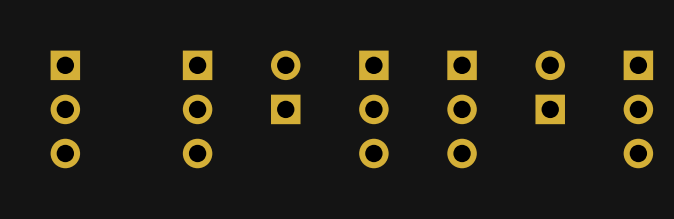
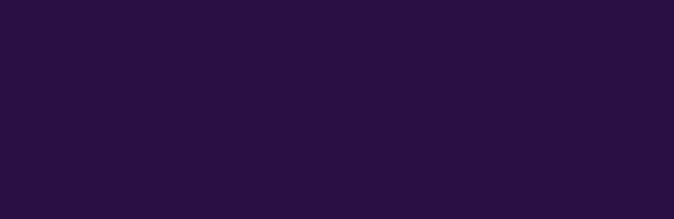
part: (285, 87) -> none
part: (550, 87) -> none
part: (65, 109) -> none
part: (197, 109) -> none
part: (373, 109) -> none
part: (462, 109) -> none
part: (638, 109) -> none

